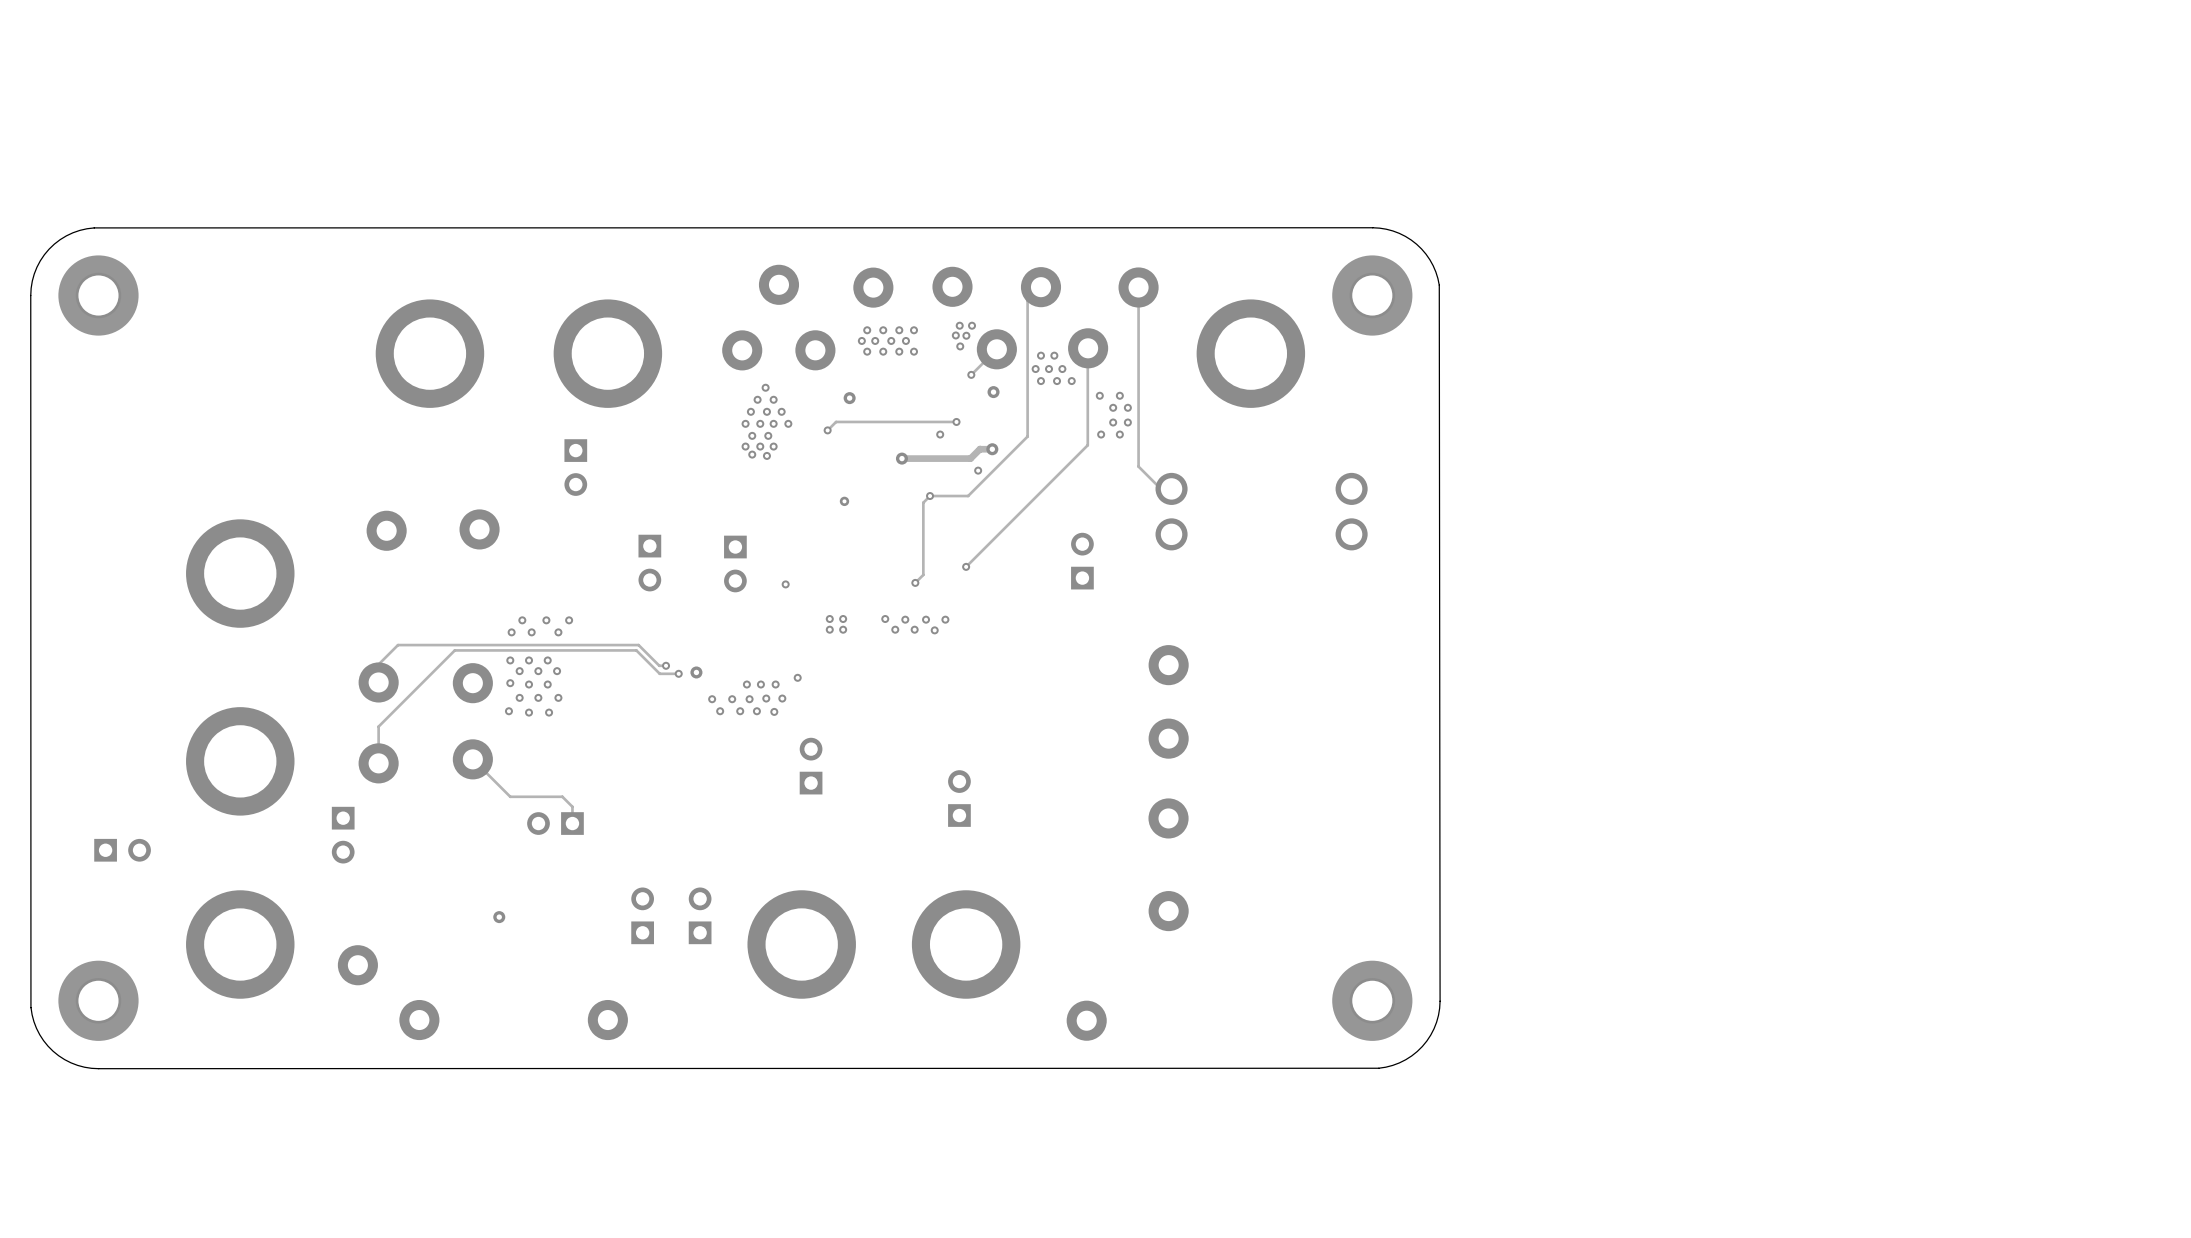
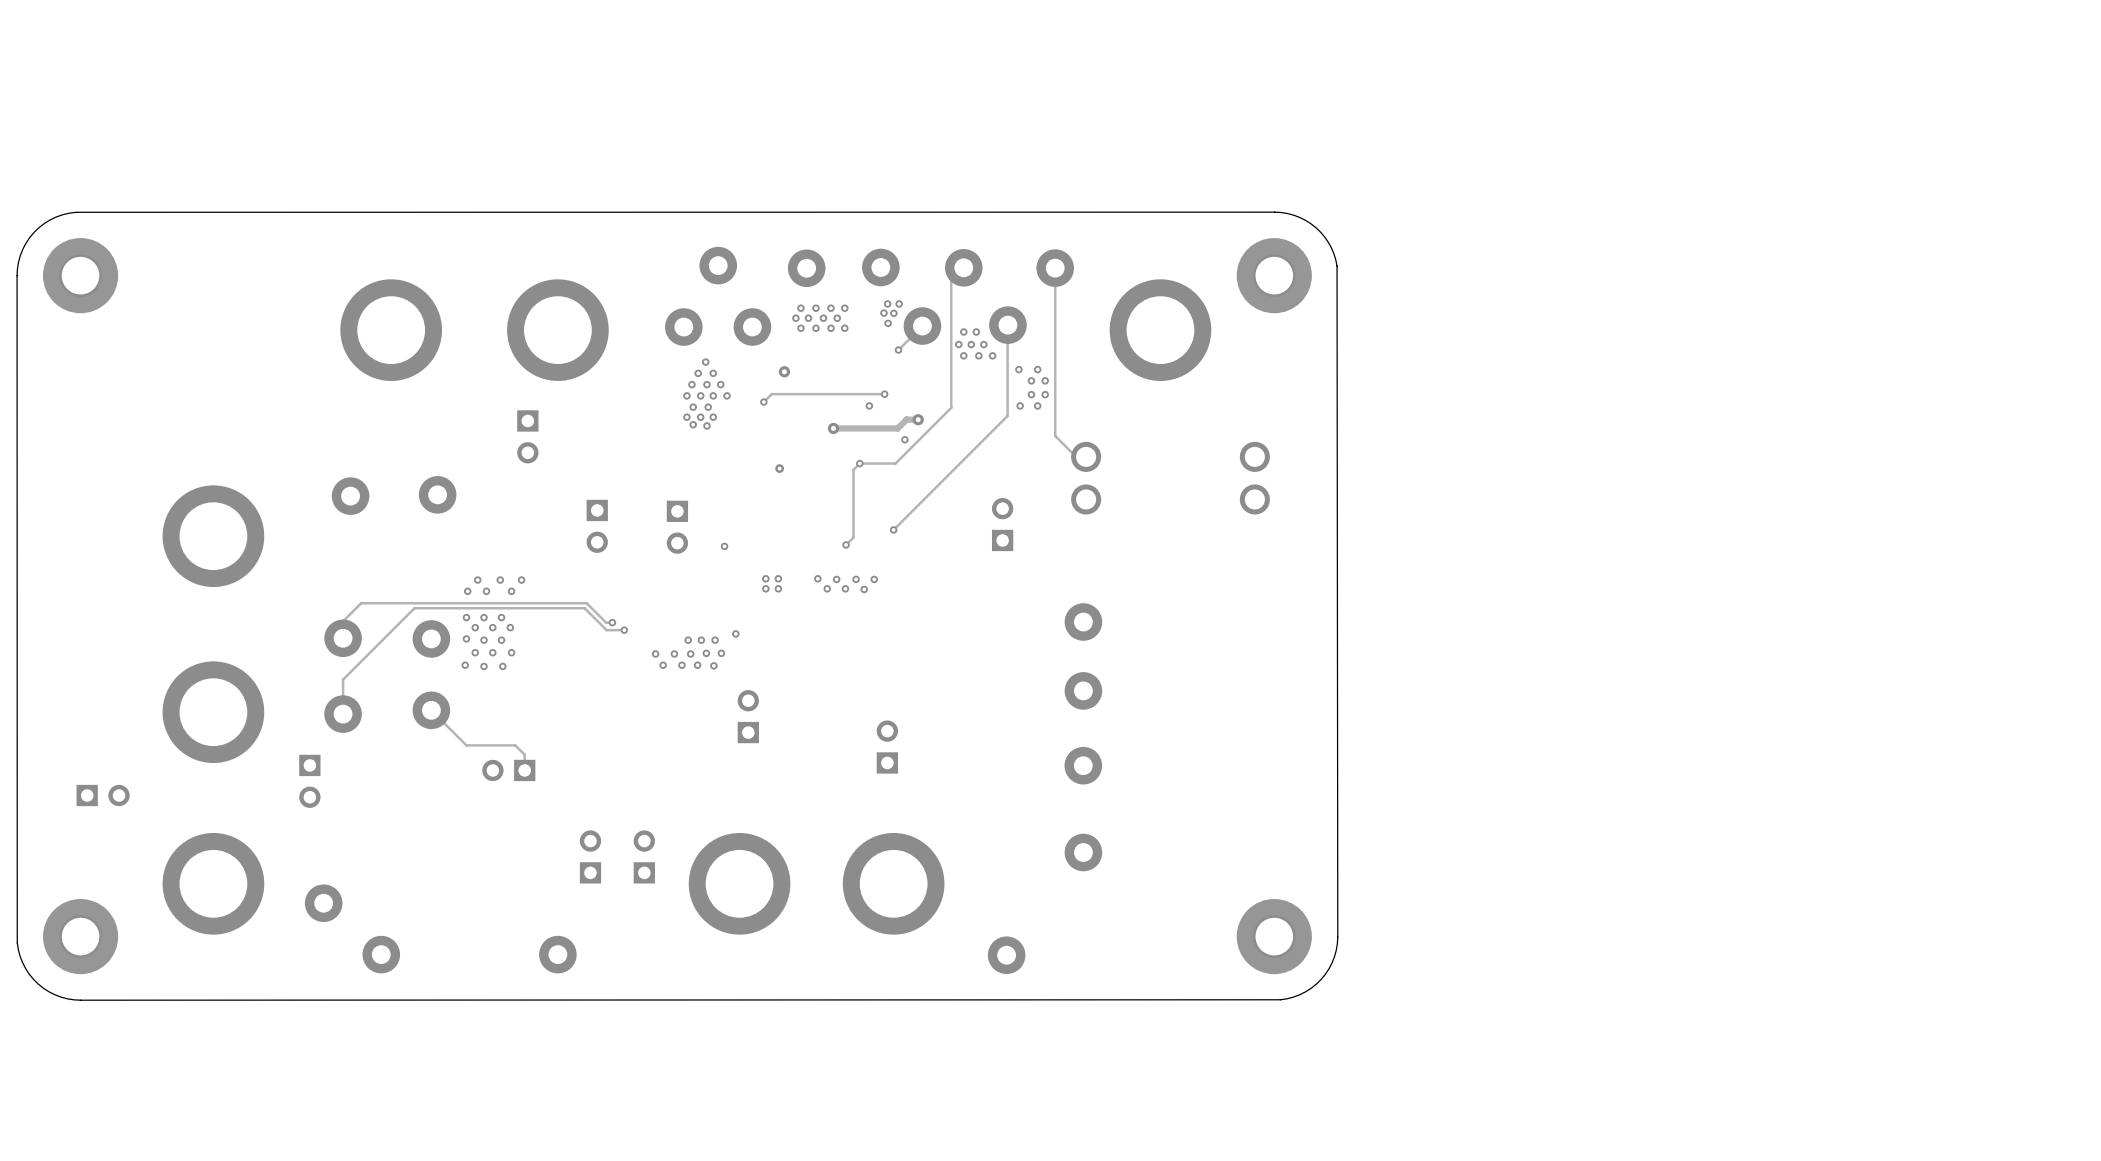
via: (993, 392) -> none
via: (696, 672) -> none
via: (499, 917) -> none

